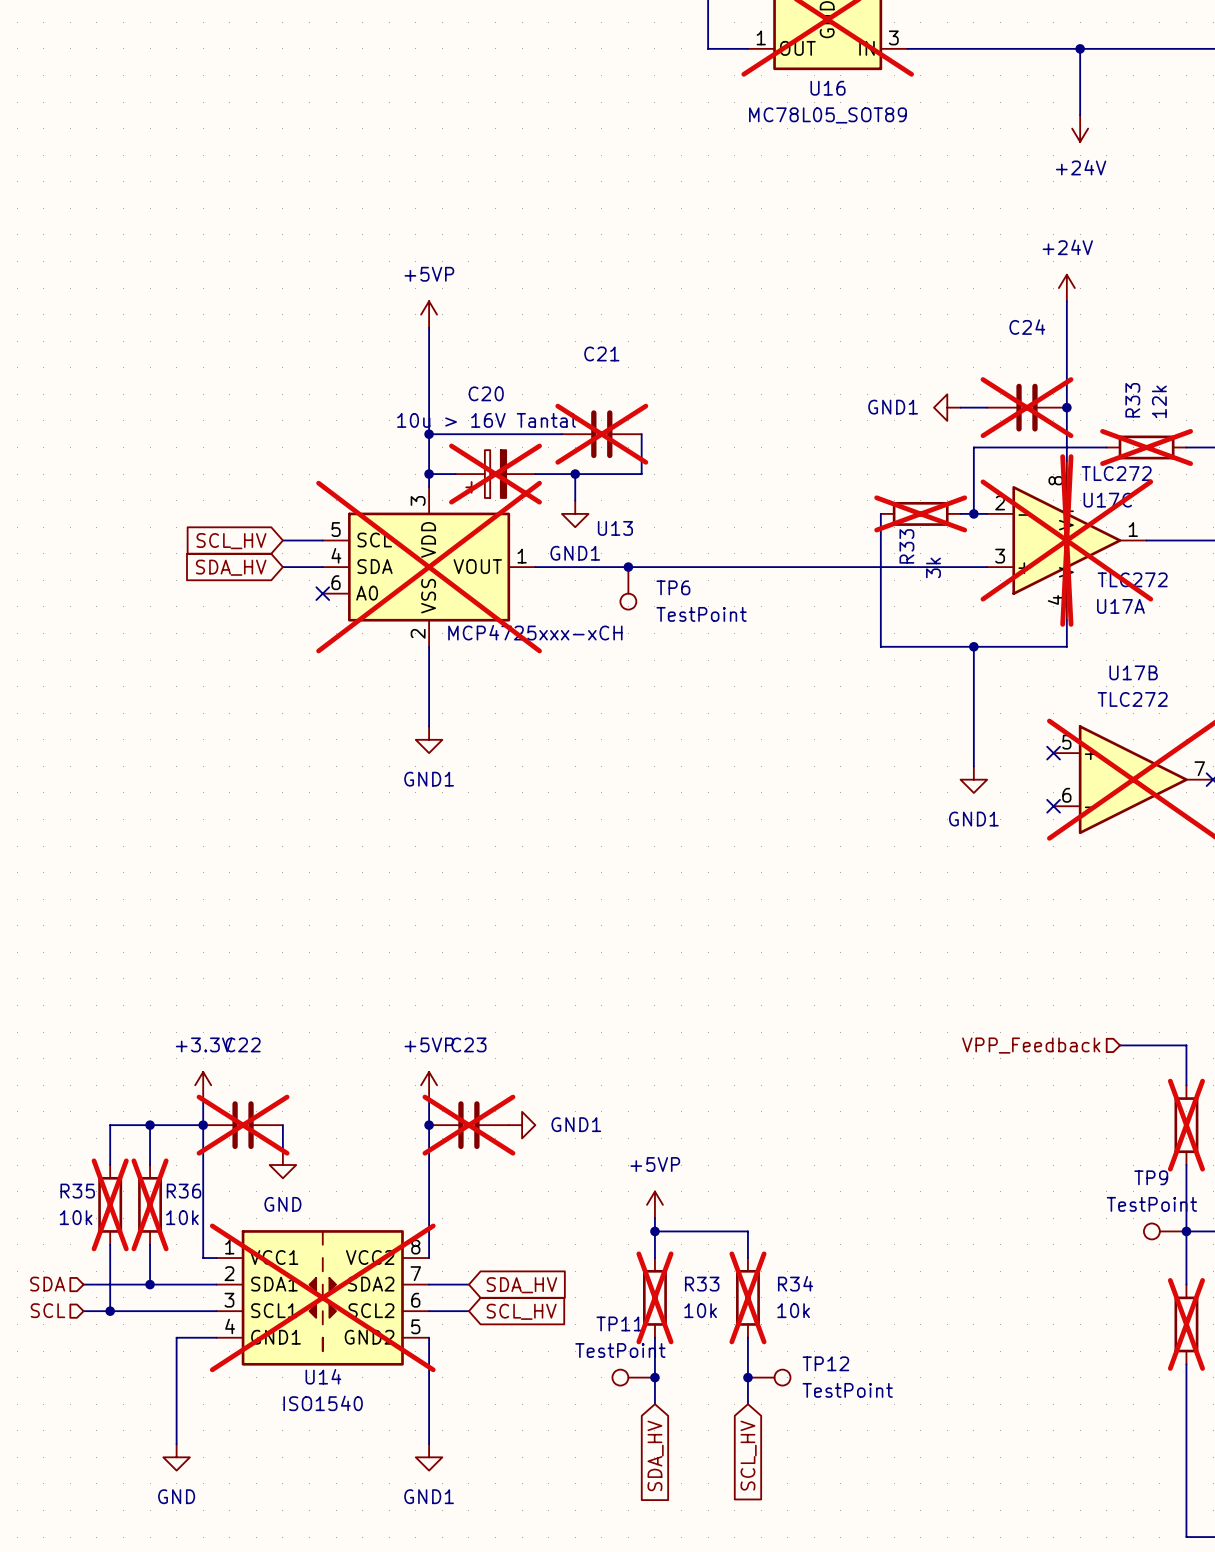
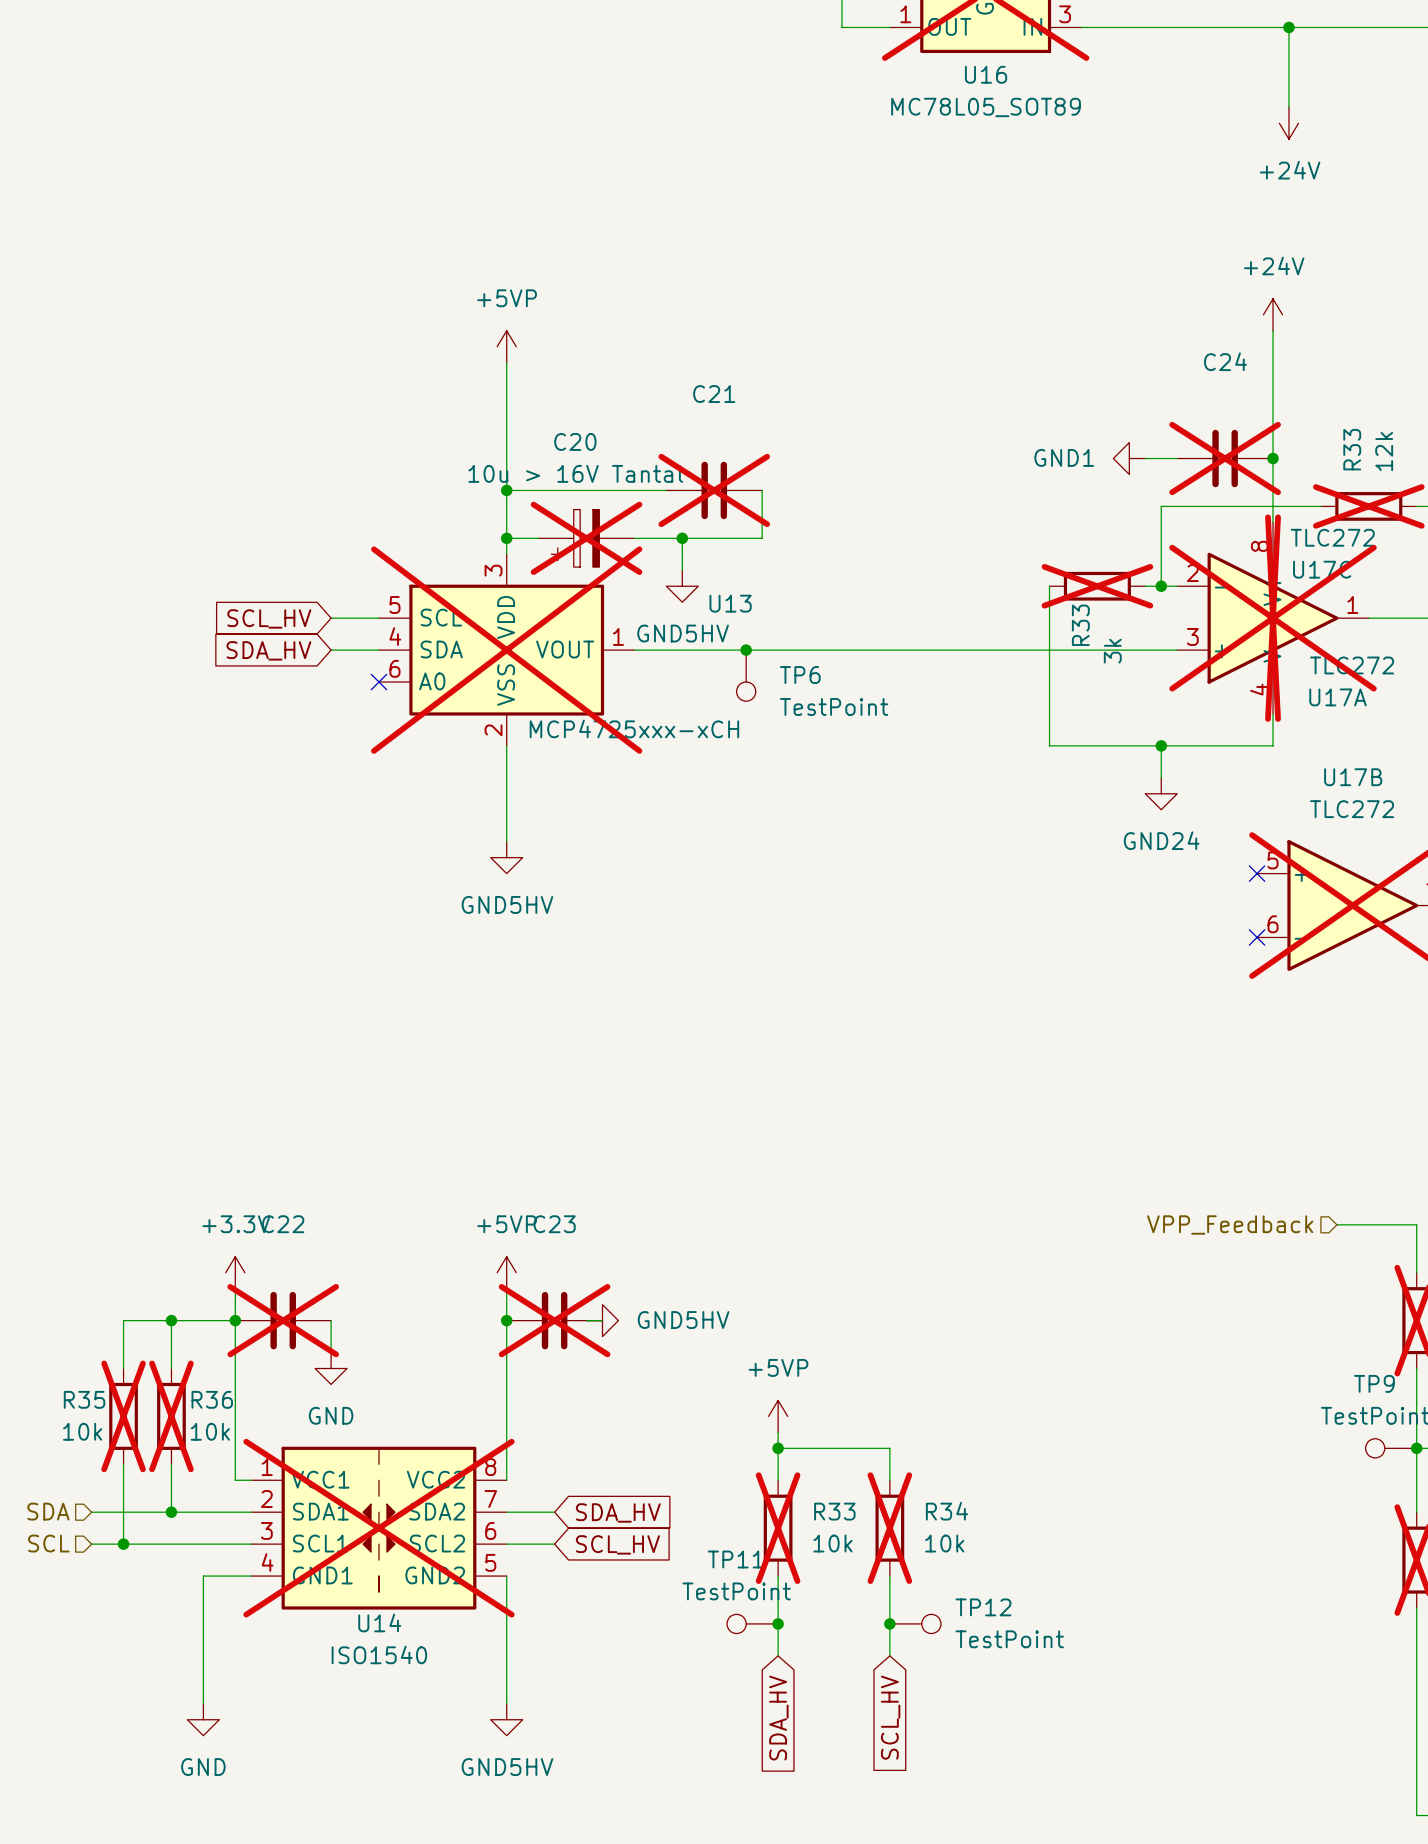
power symbol: GND1 (575, 513) -> GND5HV (682, 586)
wire: (973, 673) (973, 766) -> none
power symbol: none -> GND24 (1161, 793)
power symbol: GND1 (429, 739) -> GND5HV (506, 857)
power symbol: GND1 (973, 779) -> none
power symbol: none -> GND5HV (602, 1320)
power symbol: GND1 (522, 1125) -> none
power symbol: GND1 (429, 1457) -> GND5HV (506, 1719)

